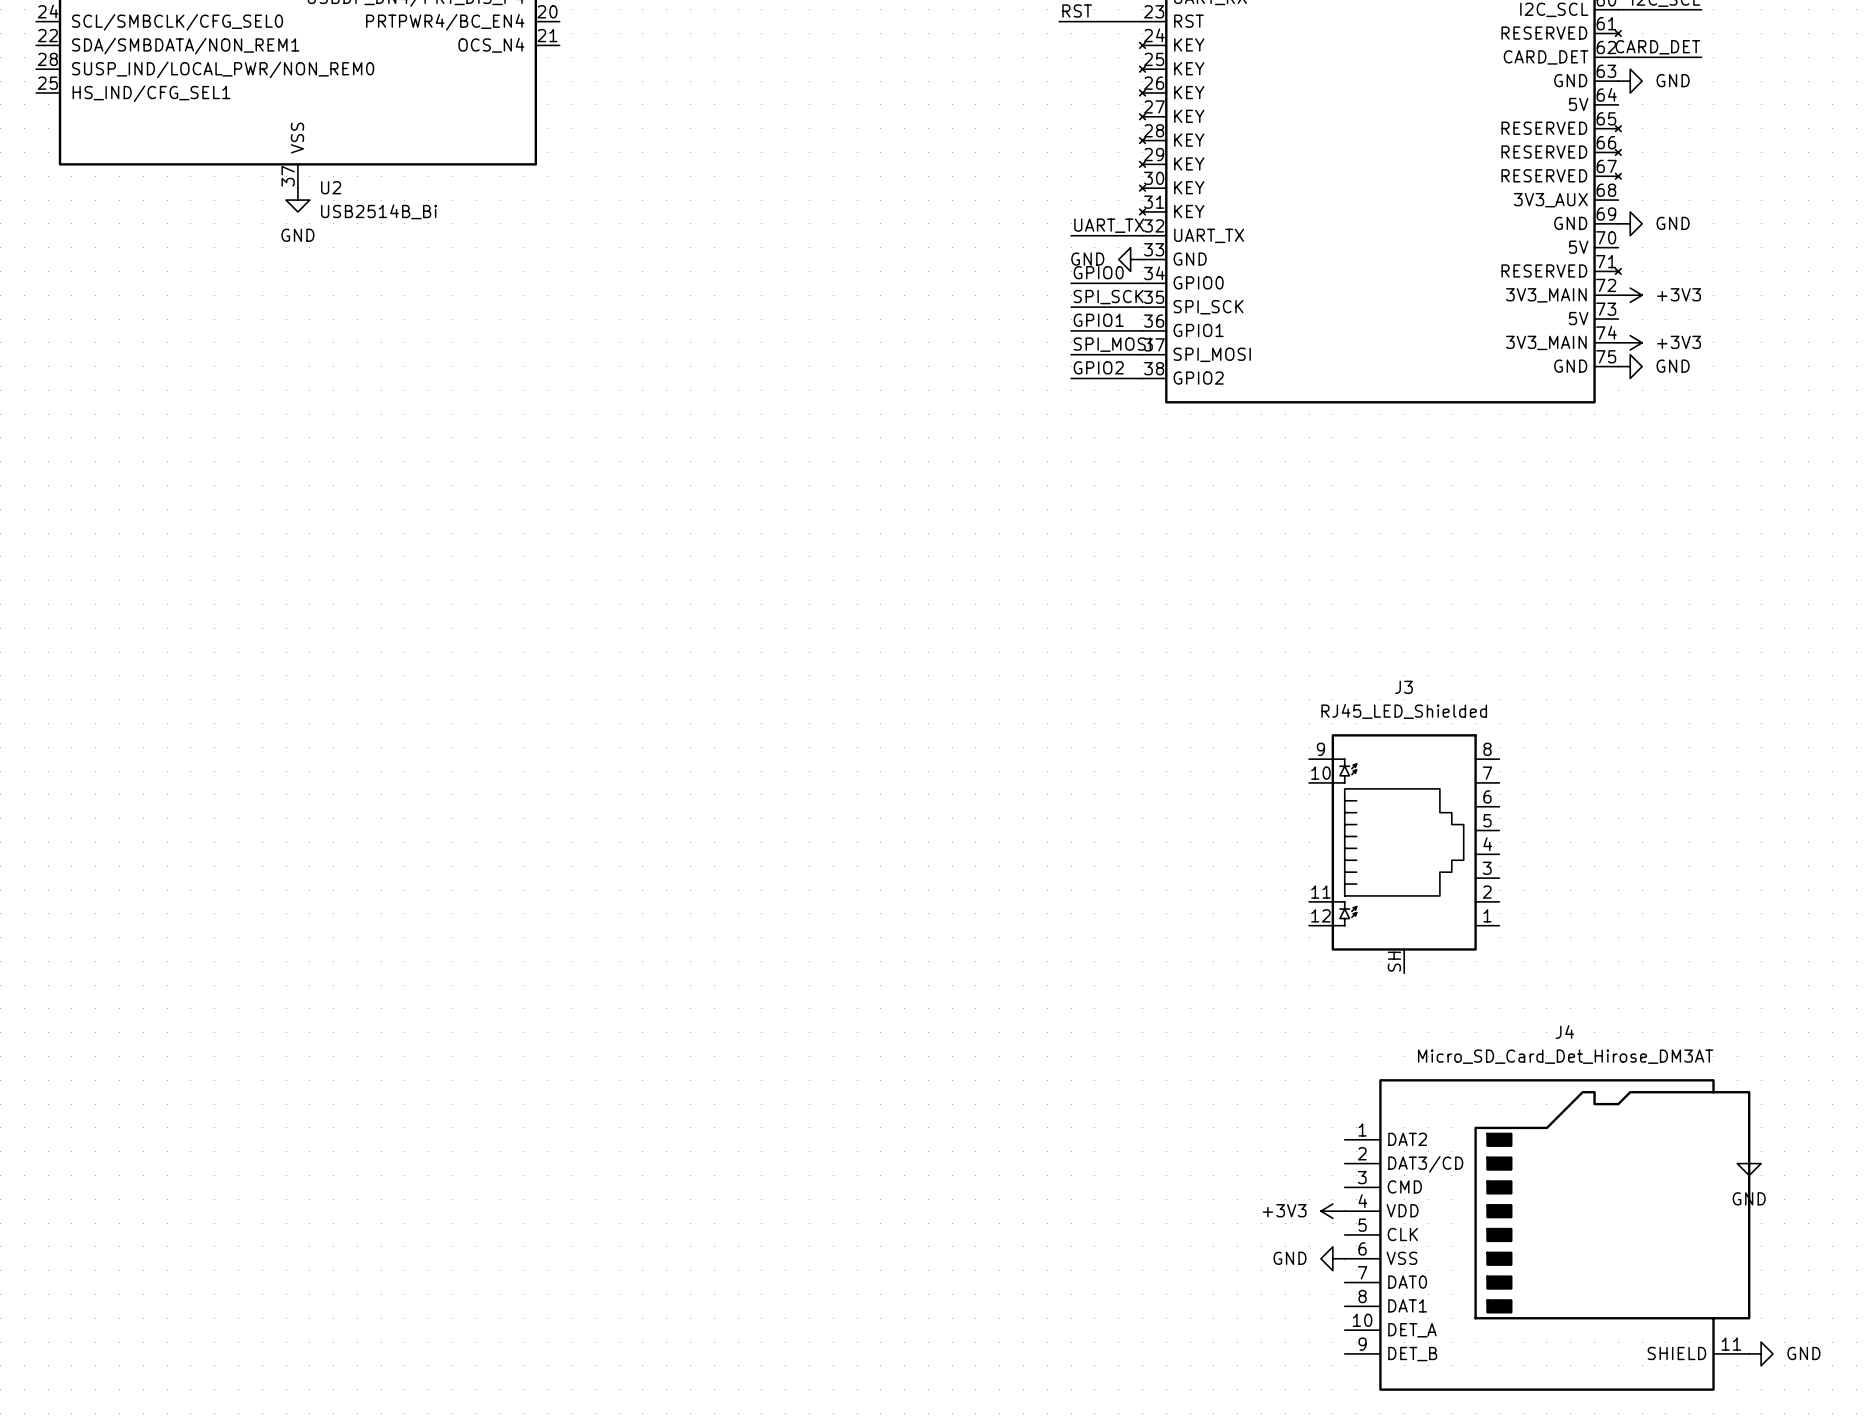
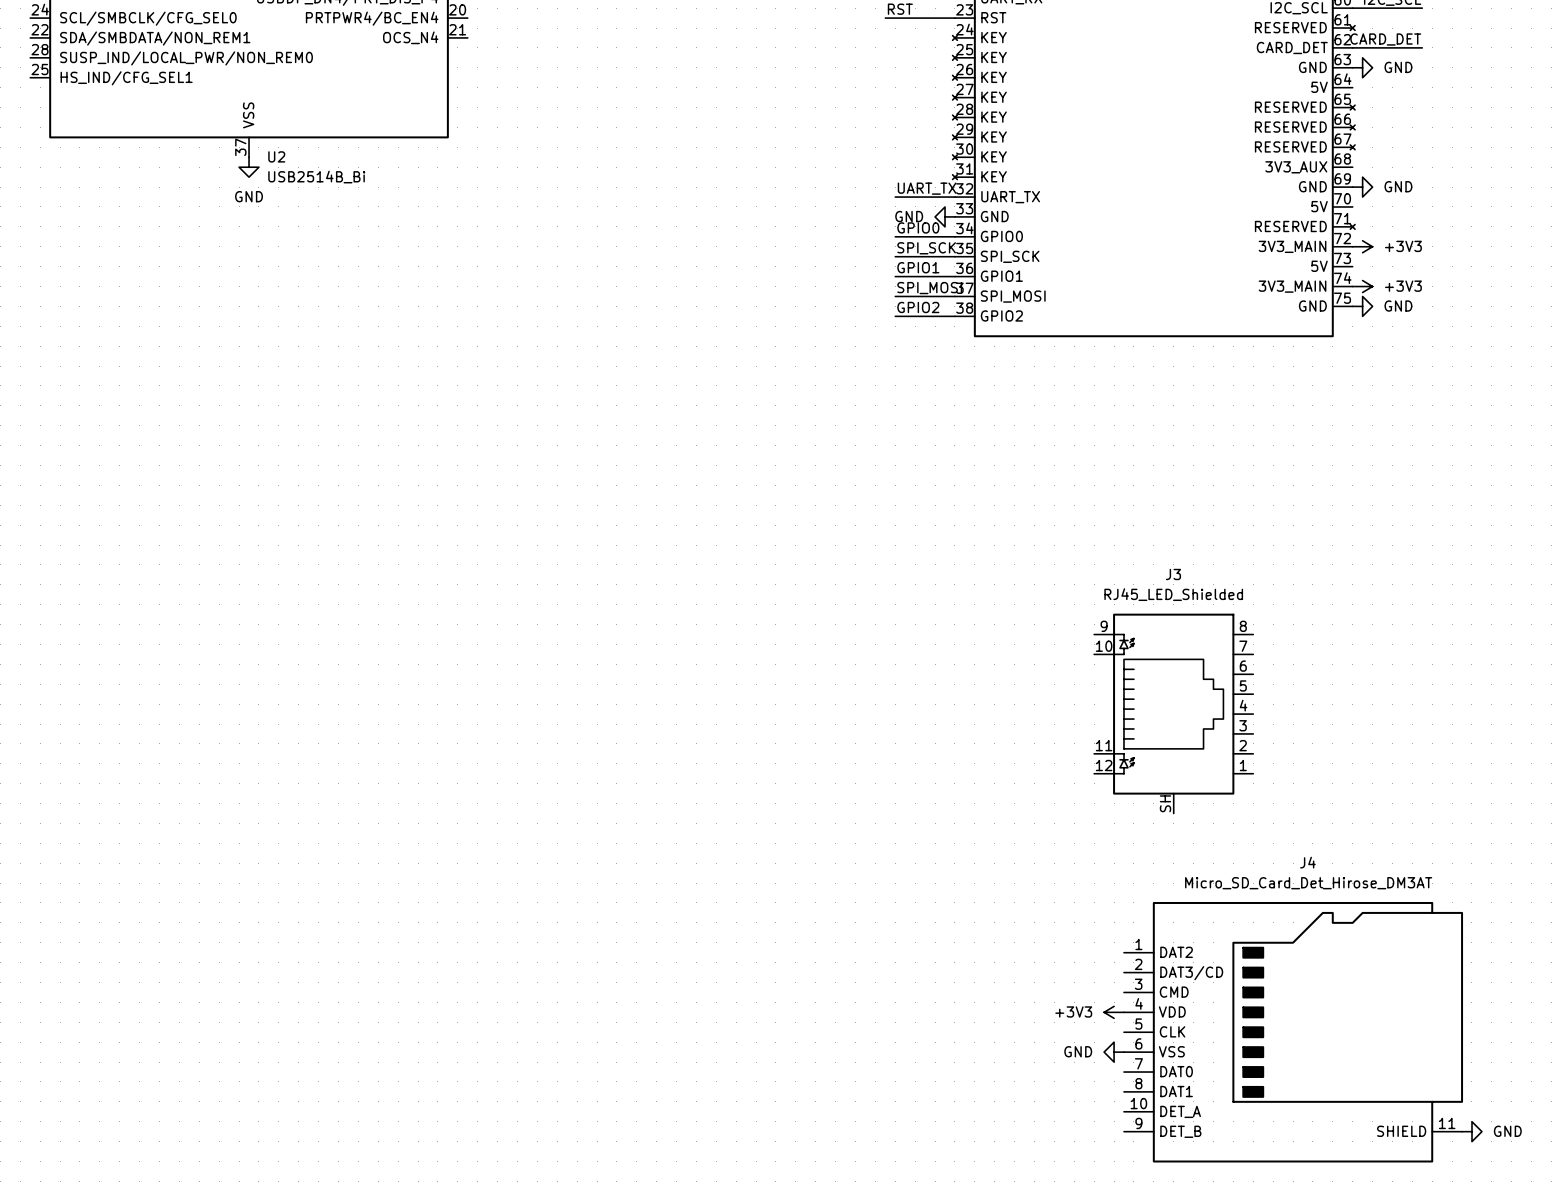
power symbol: GND (1749, 1163) -> none

